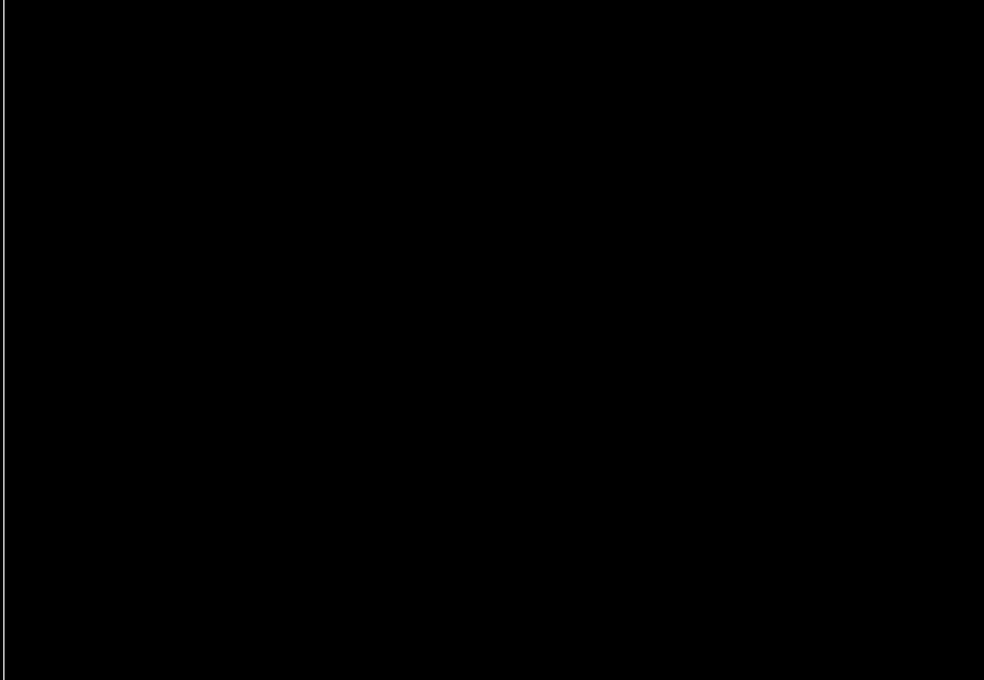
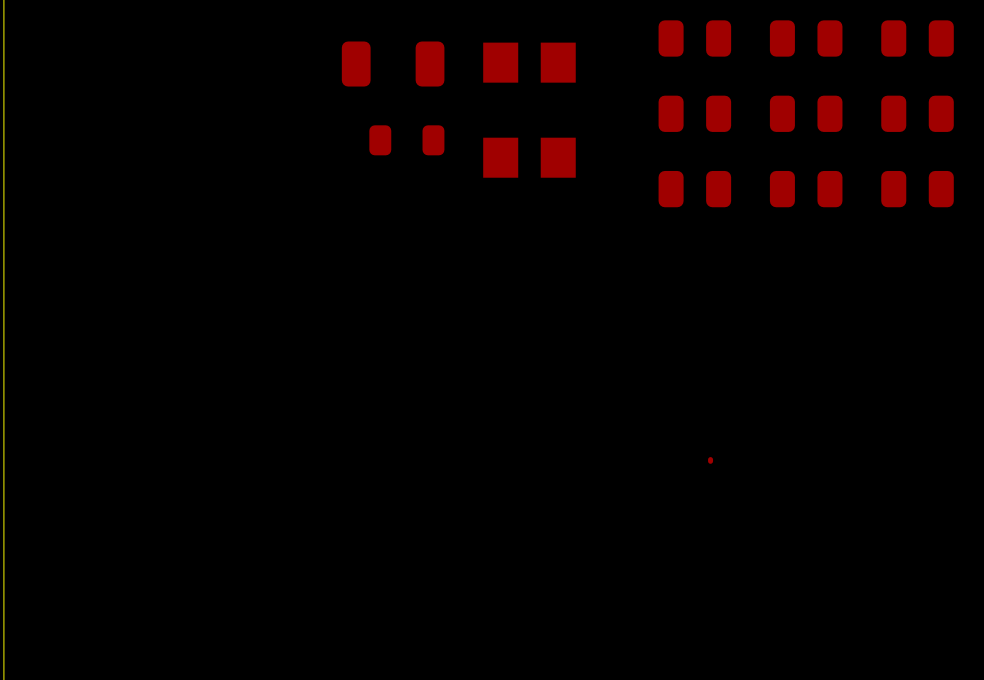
part: none -> (694, 38)
part: none -> (806, 38)
part: none -> (917, 38)
part: none -> (393, 64)
part: none -> (529, 110)
part: none -> (694, 113)
part: none -> (806, 113)
part: none -> (917, 113)
part: none -> (406, 140)
part: none -> (694, 189)
part: none -> (806, 189)
part: none -> (917, 189)
top track: none -> (710, 459) (710, 461)

